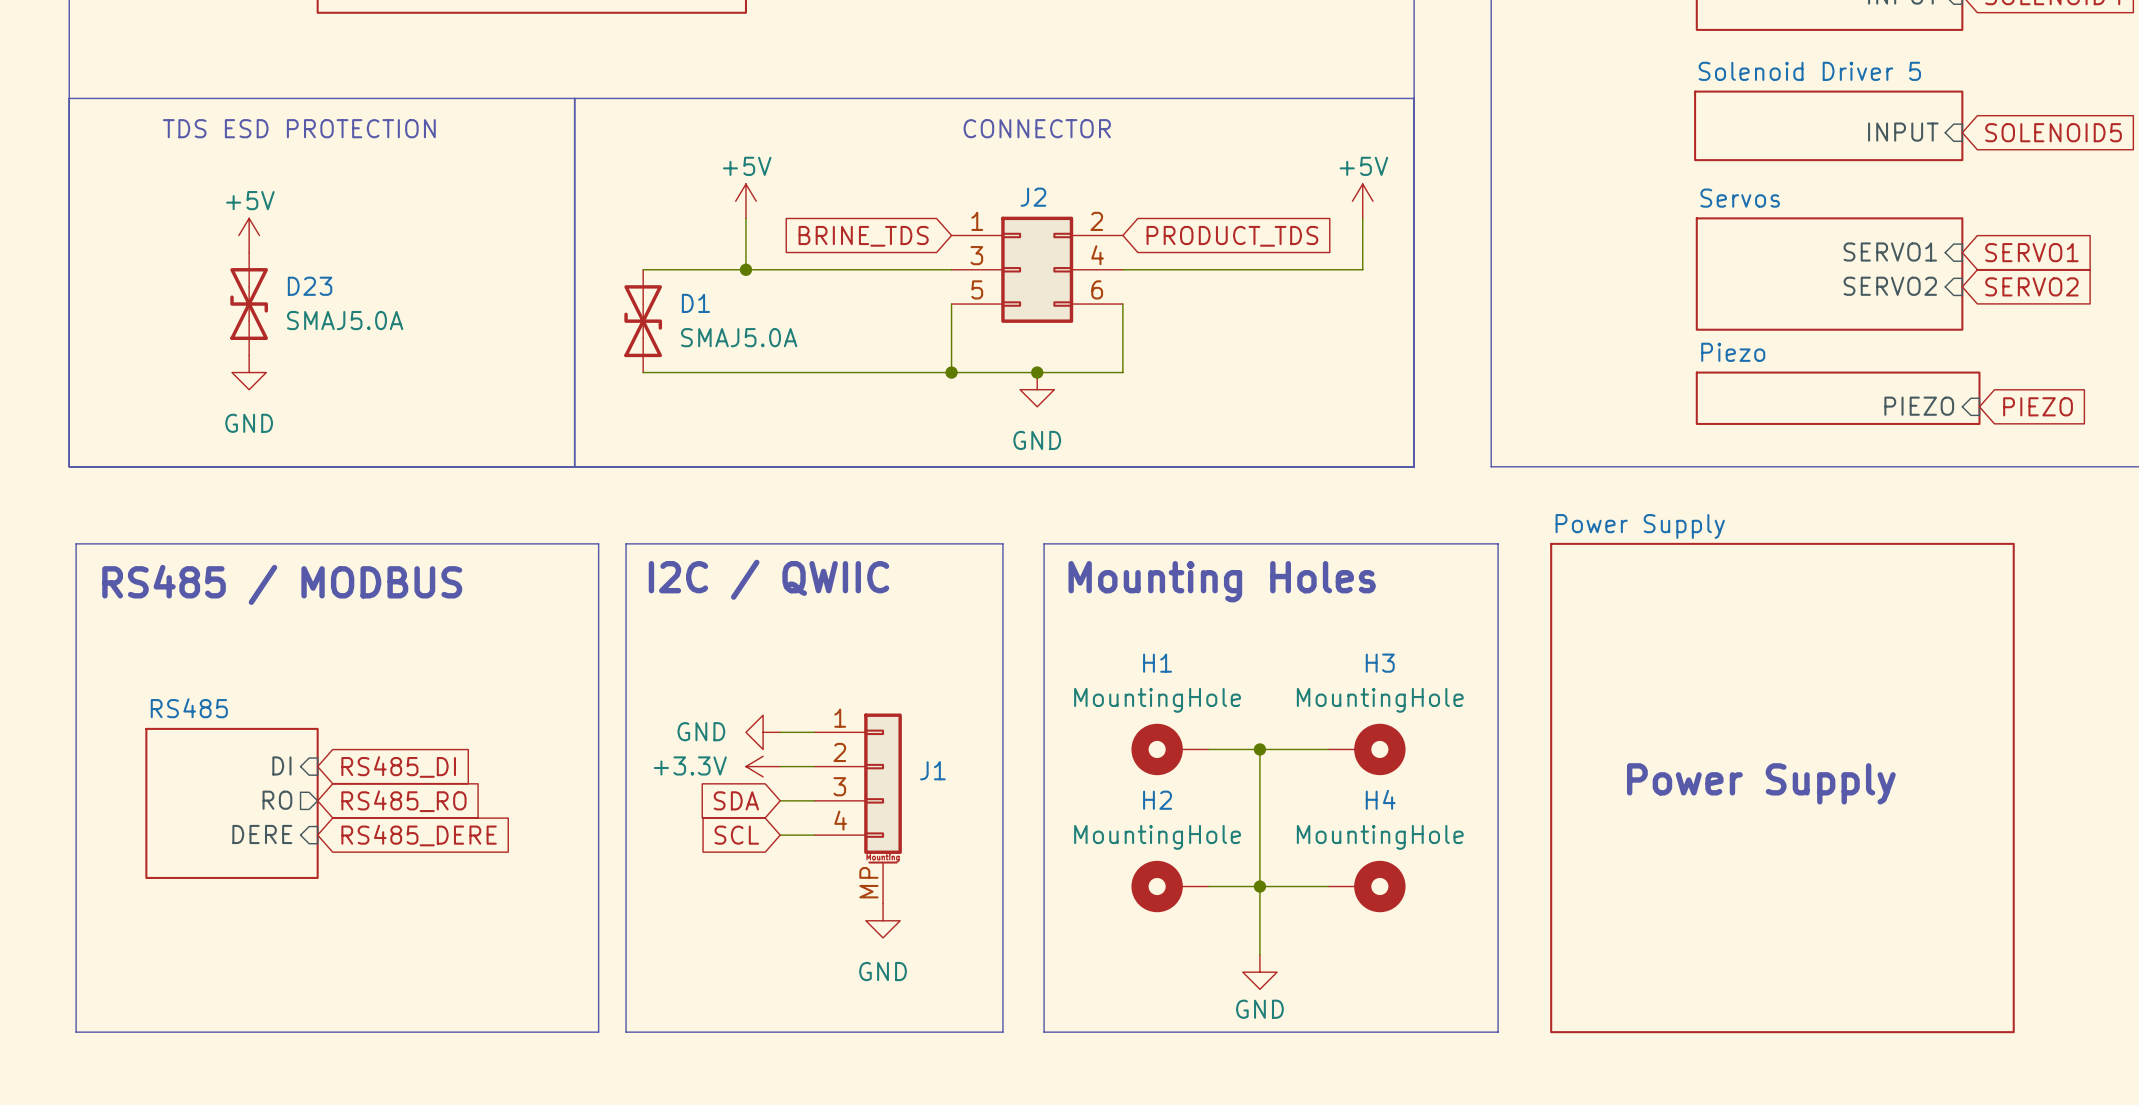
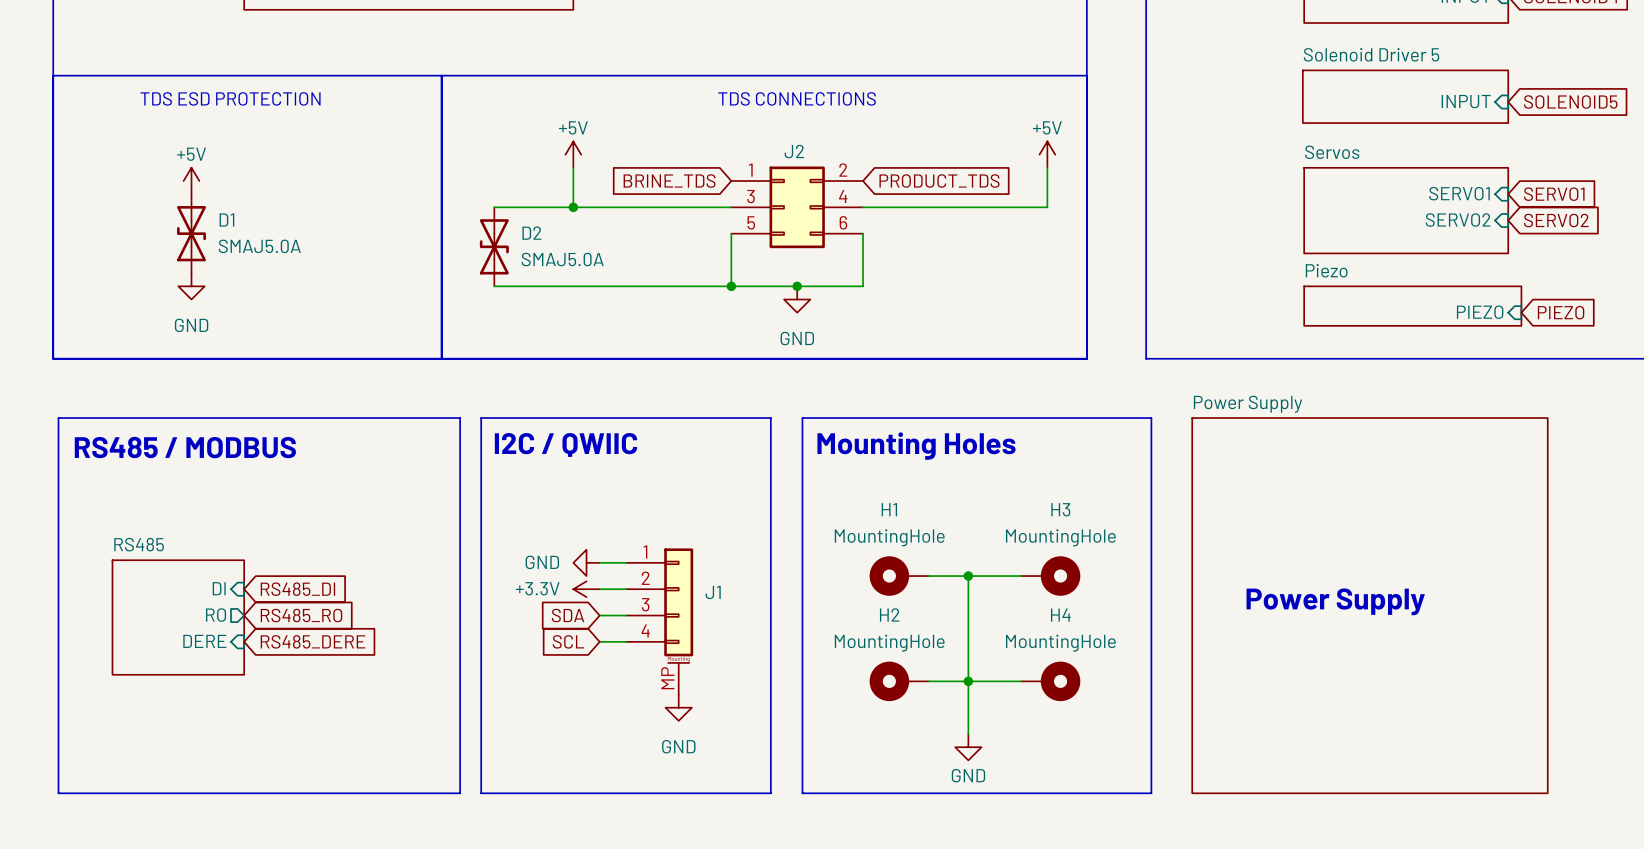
text: CONNECTOR (1037, 128) -> TDS CONNECTIONS (797, 98)
D23 name: D23 (310, 286) -> D1 (226, 220)
D1 name: D1 (695, 303) -> D2 (531, 233)

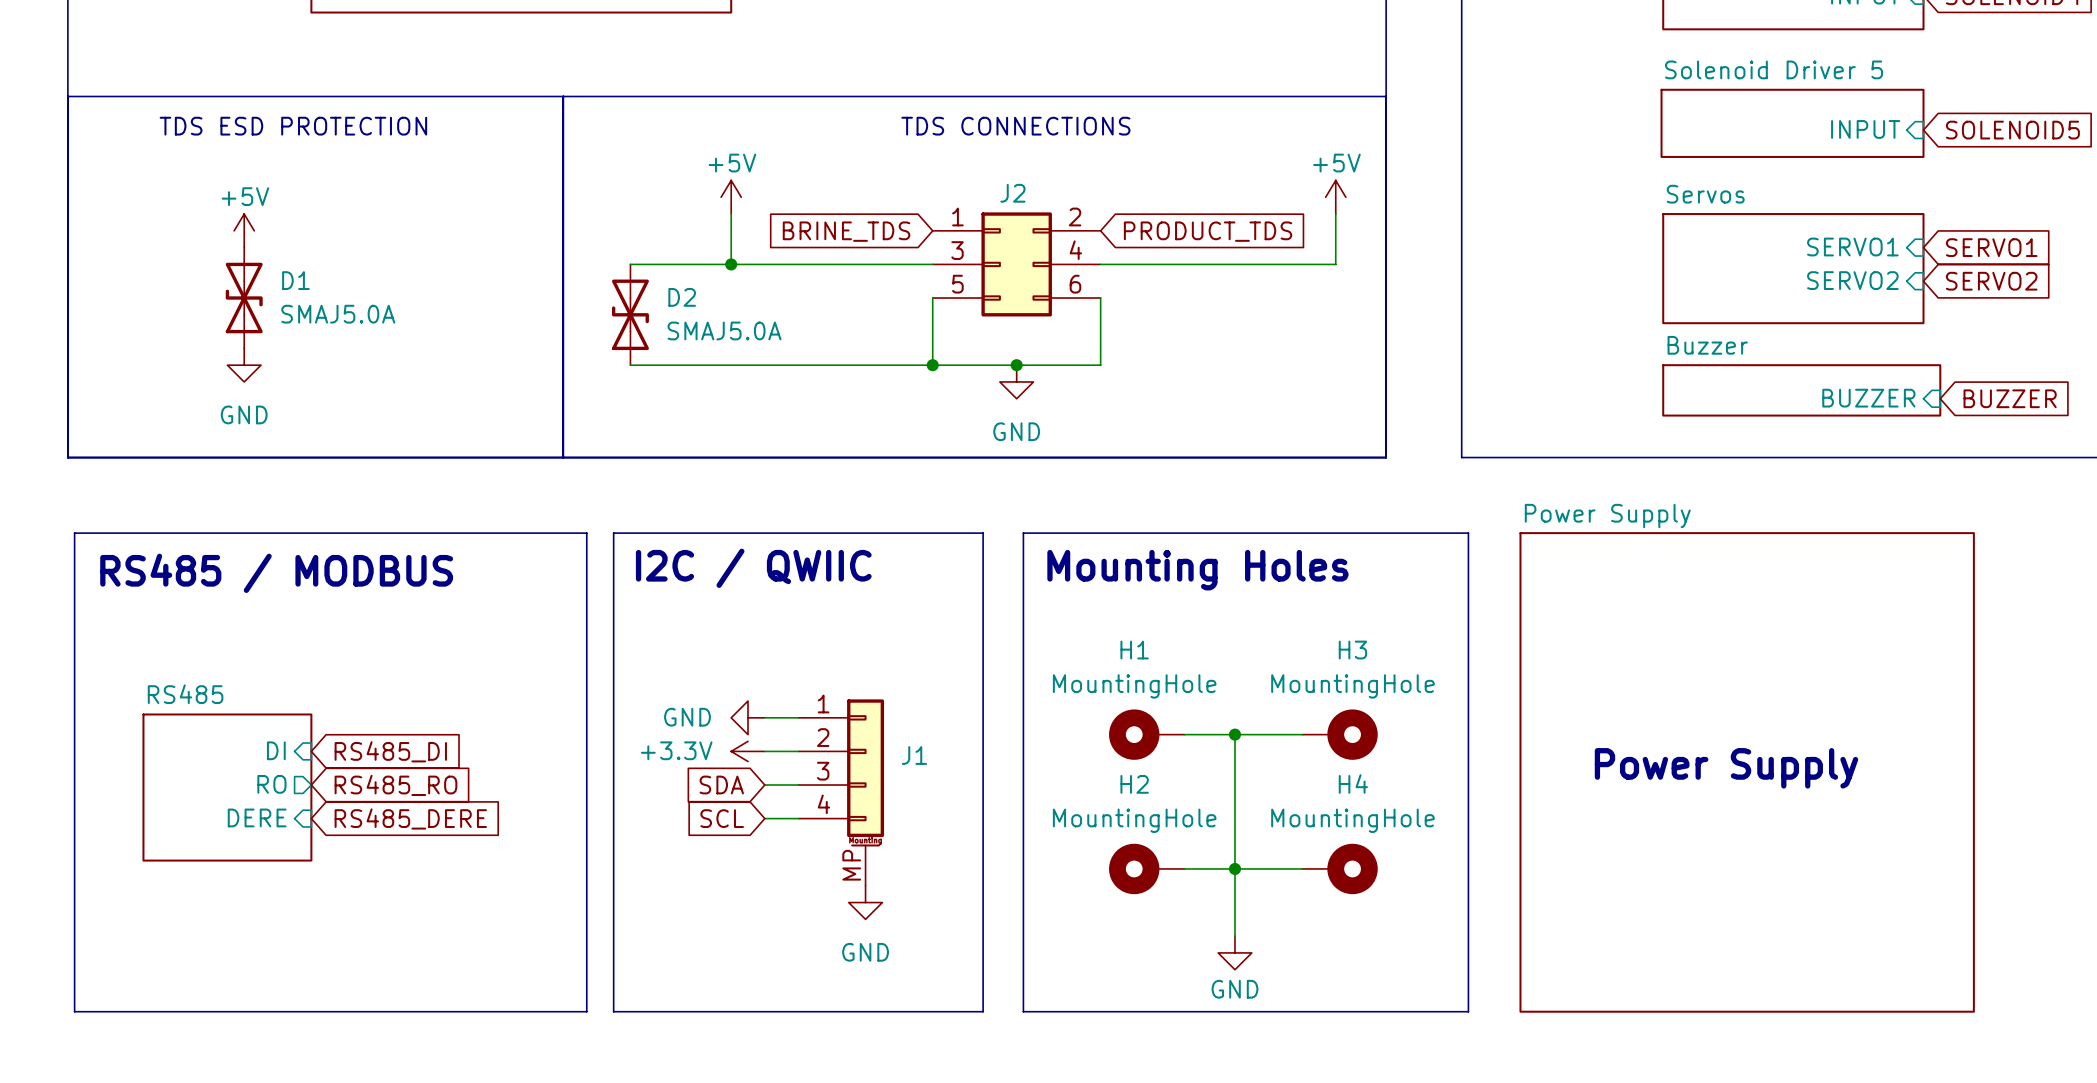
sheet Piezo name: Piezo (1326, 270) -> Buzzer (1707, 345)
sheet pin: PIEZO (1480, 312) -> BUZZER (1868, 398)
global label: PIEZO (1561, 312) -> BUZZER (2010, 398)

